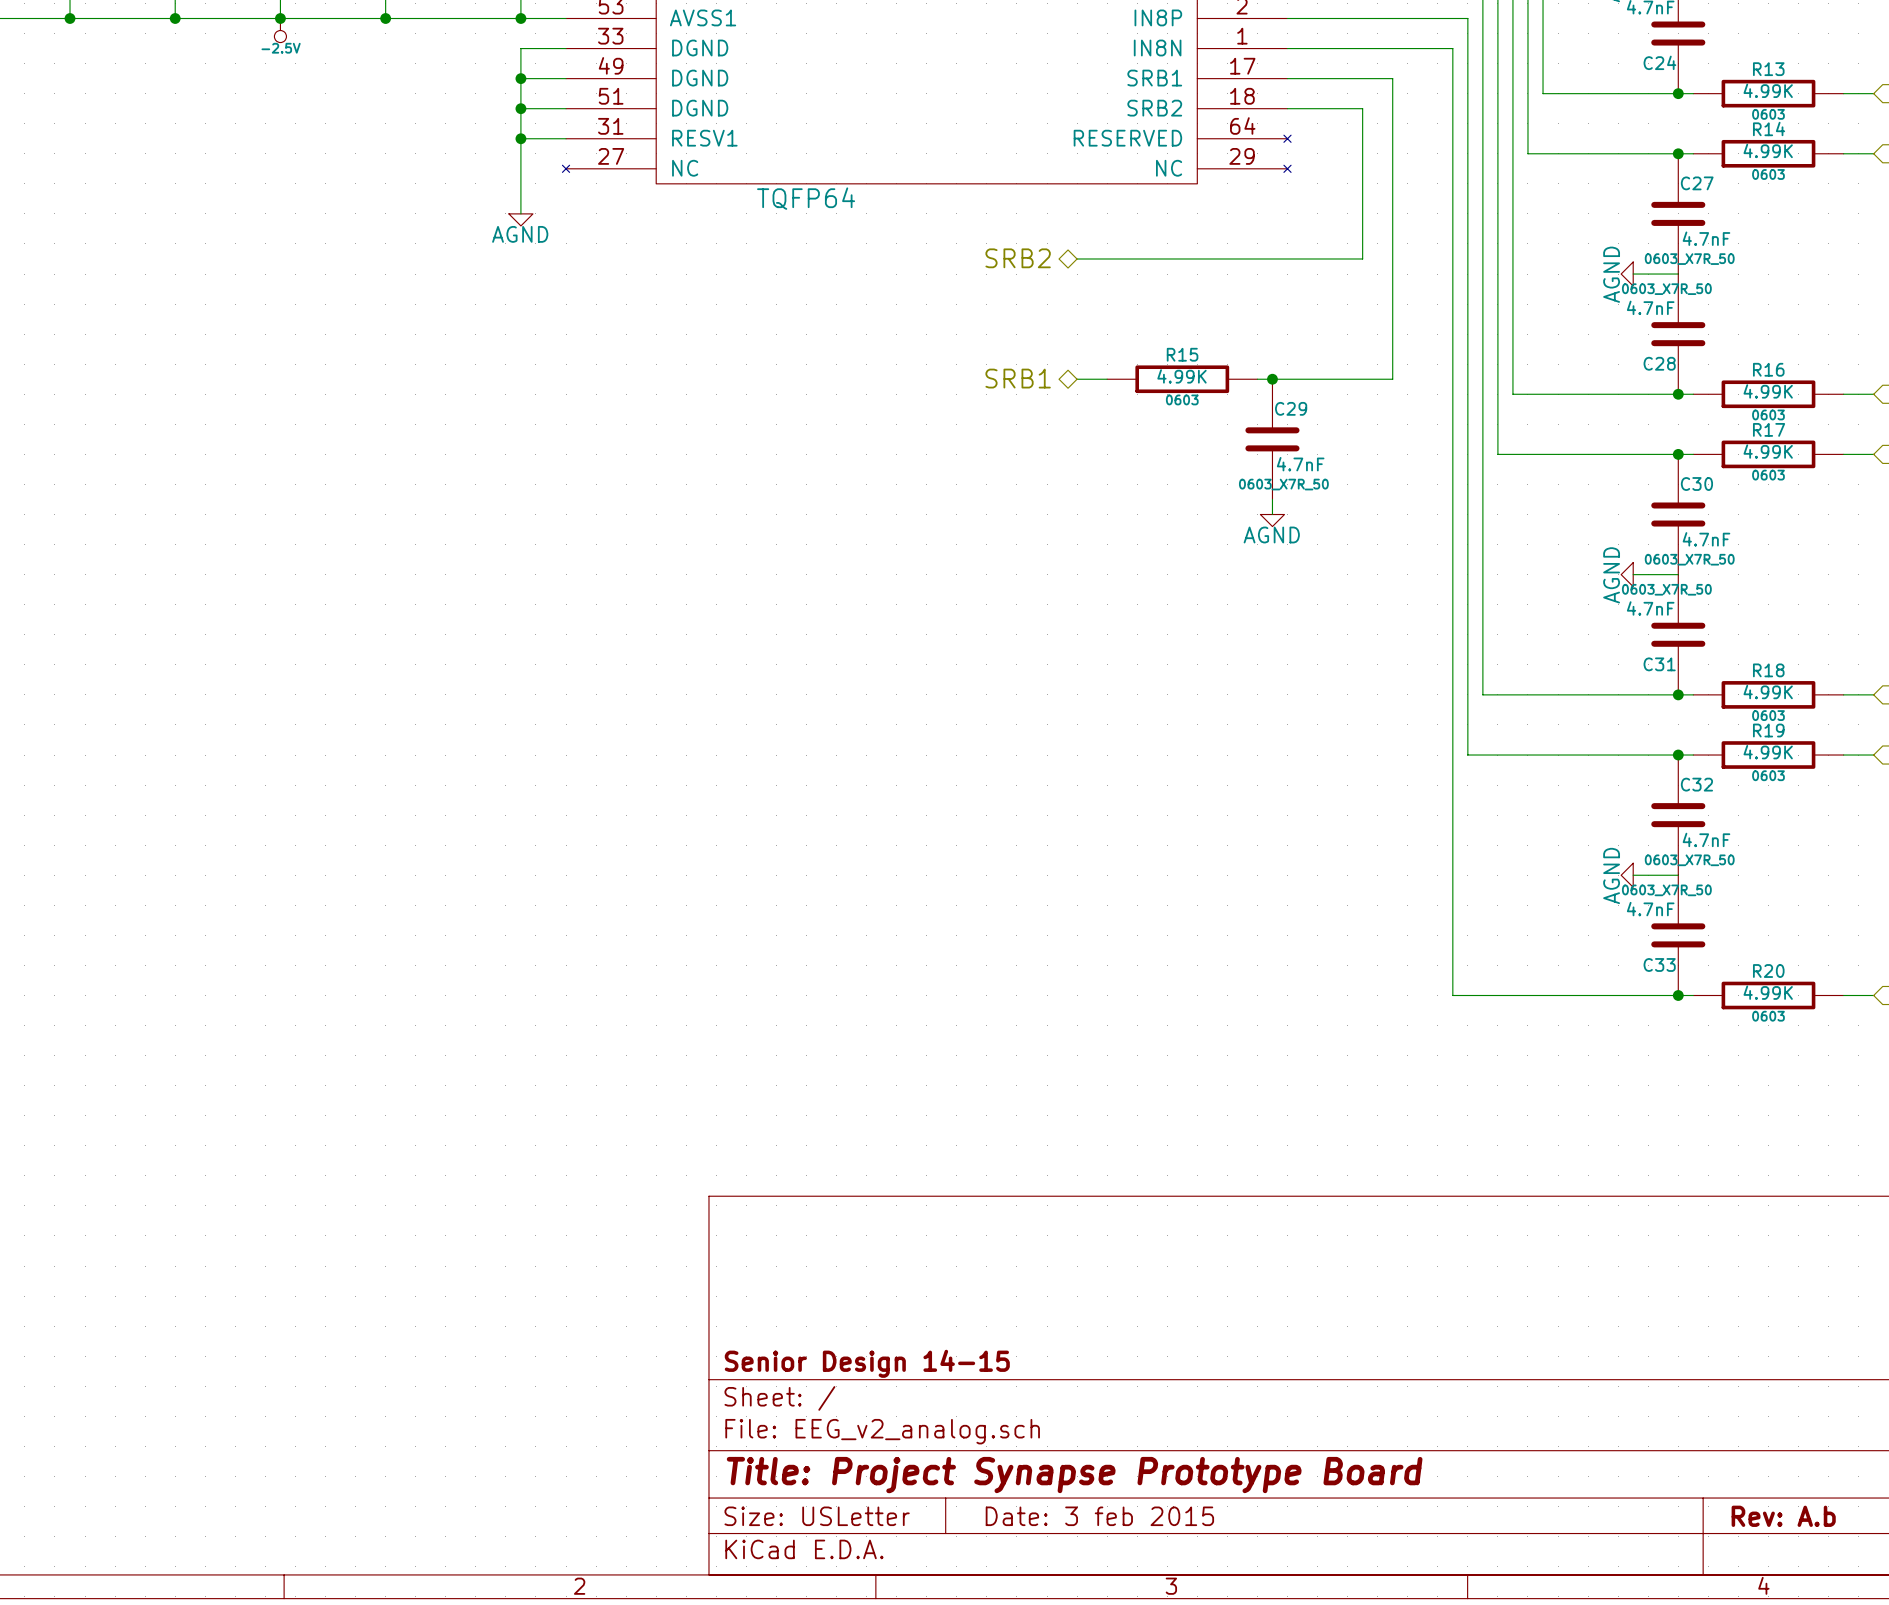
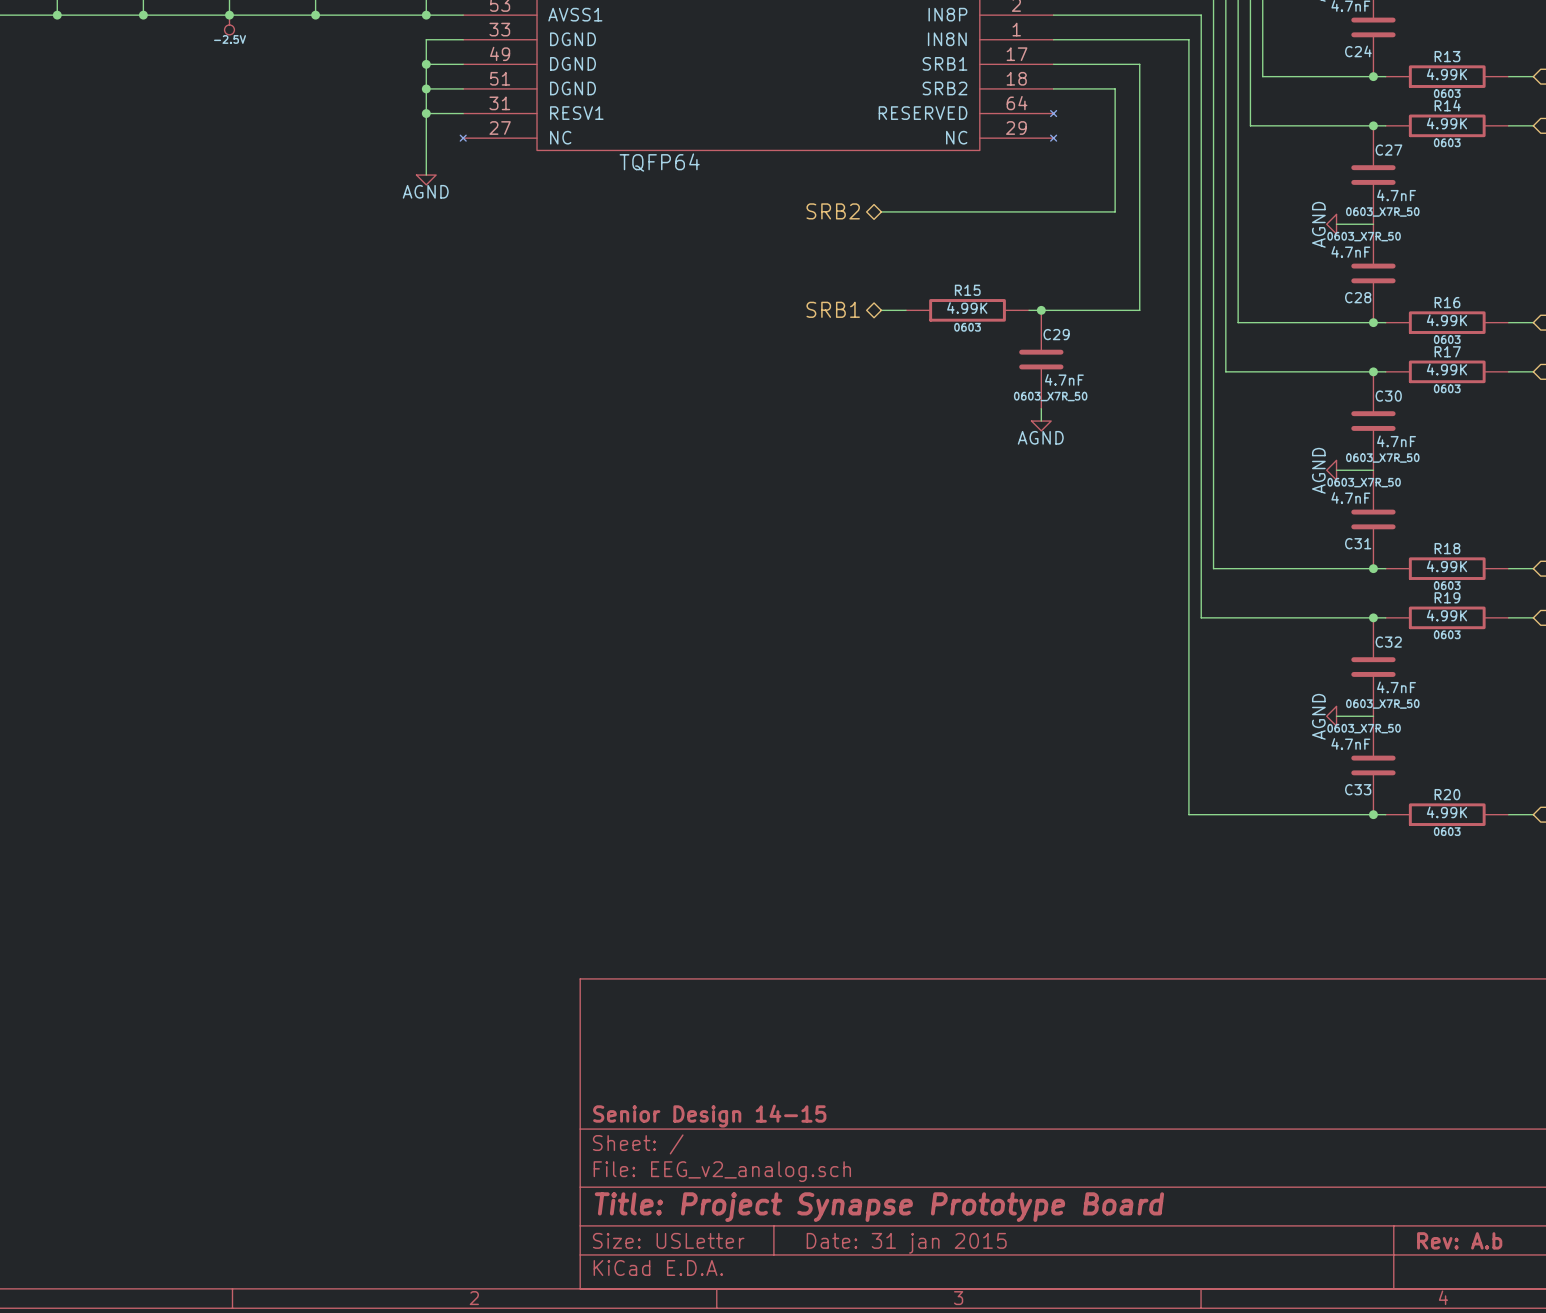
title block: Date: 3 feb 2015 (1099, 1516) -> Date: 31 jan 2015 (906, 1243)

